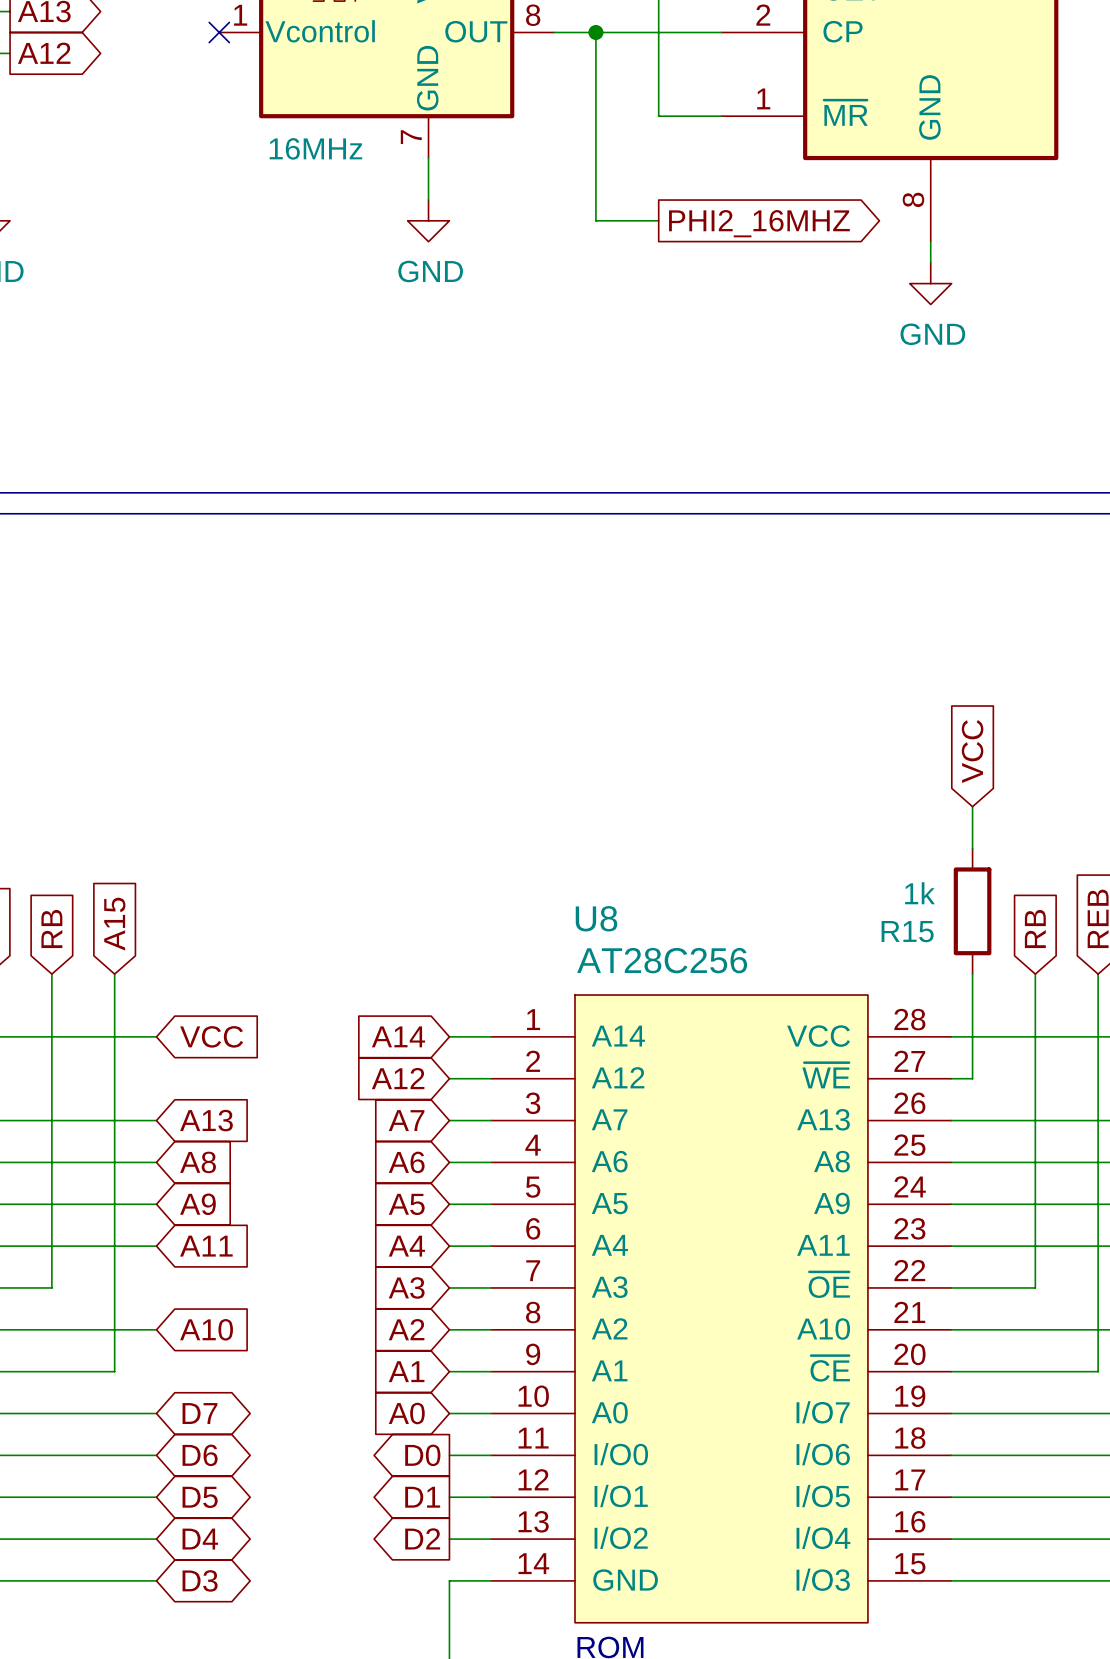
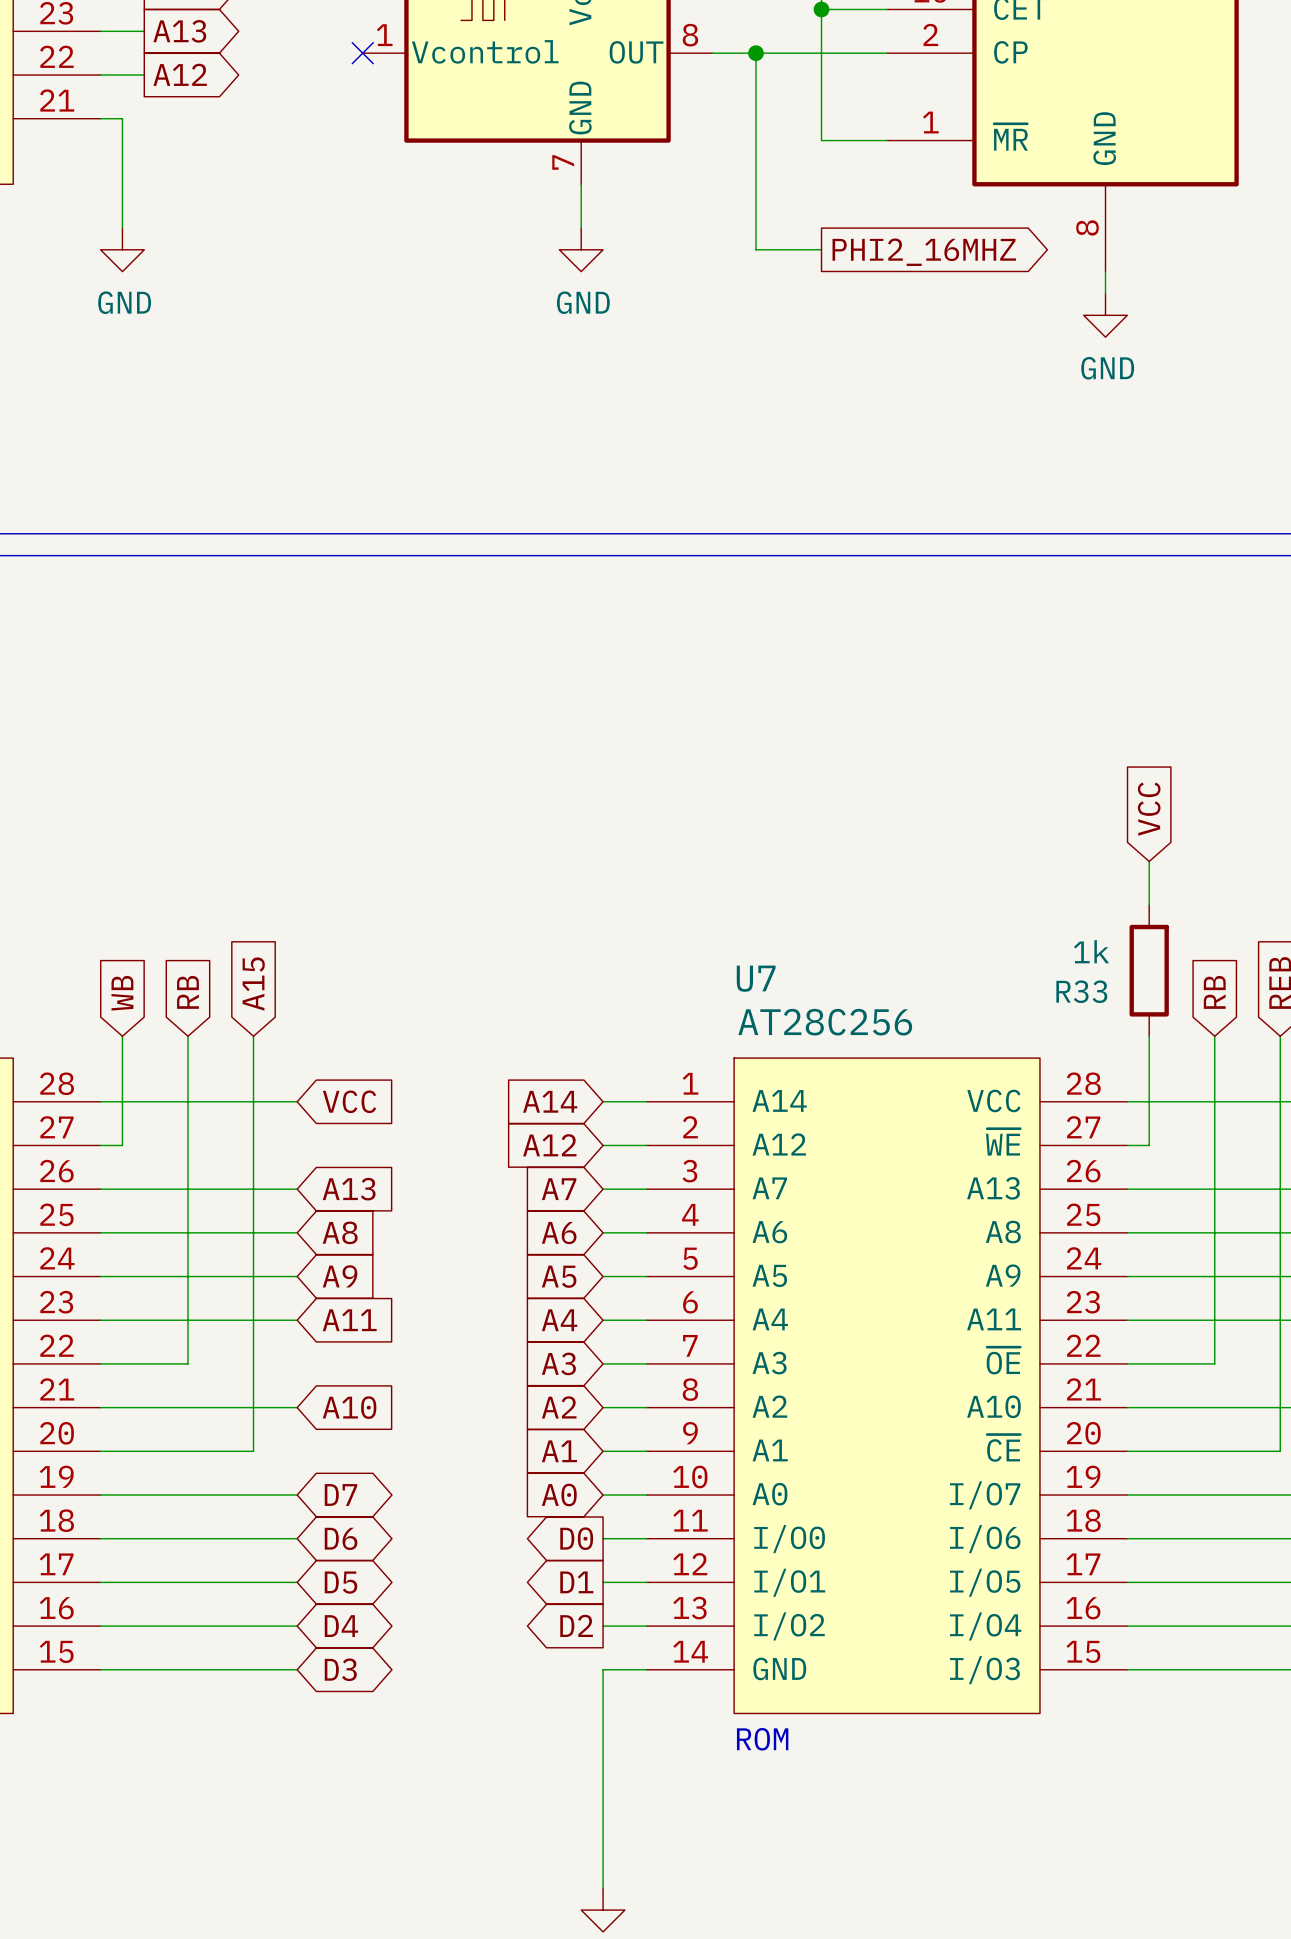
part value: 16MHz (315, 148) -> none
U8 name: U8 (596, 918) -> U7 (756, 978)
R15 name: R15 (907, 931) -> R33 (1081, 991)

